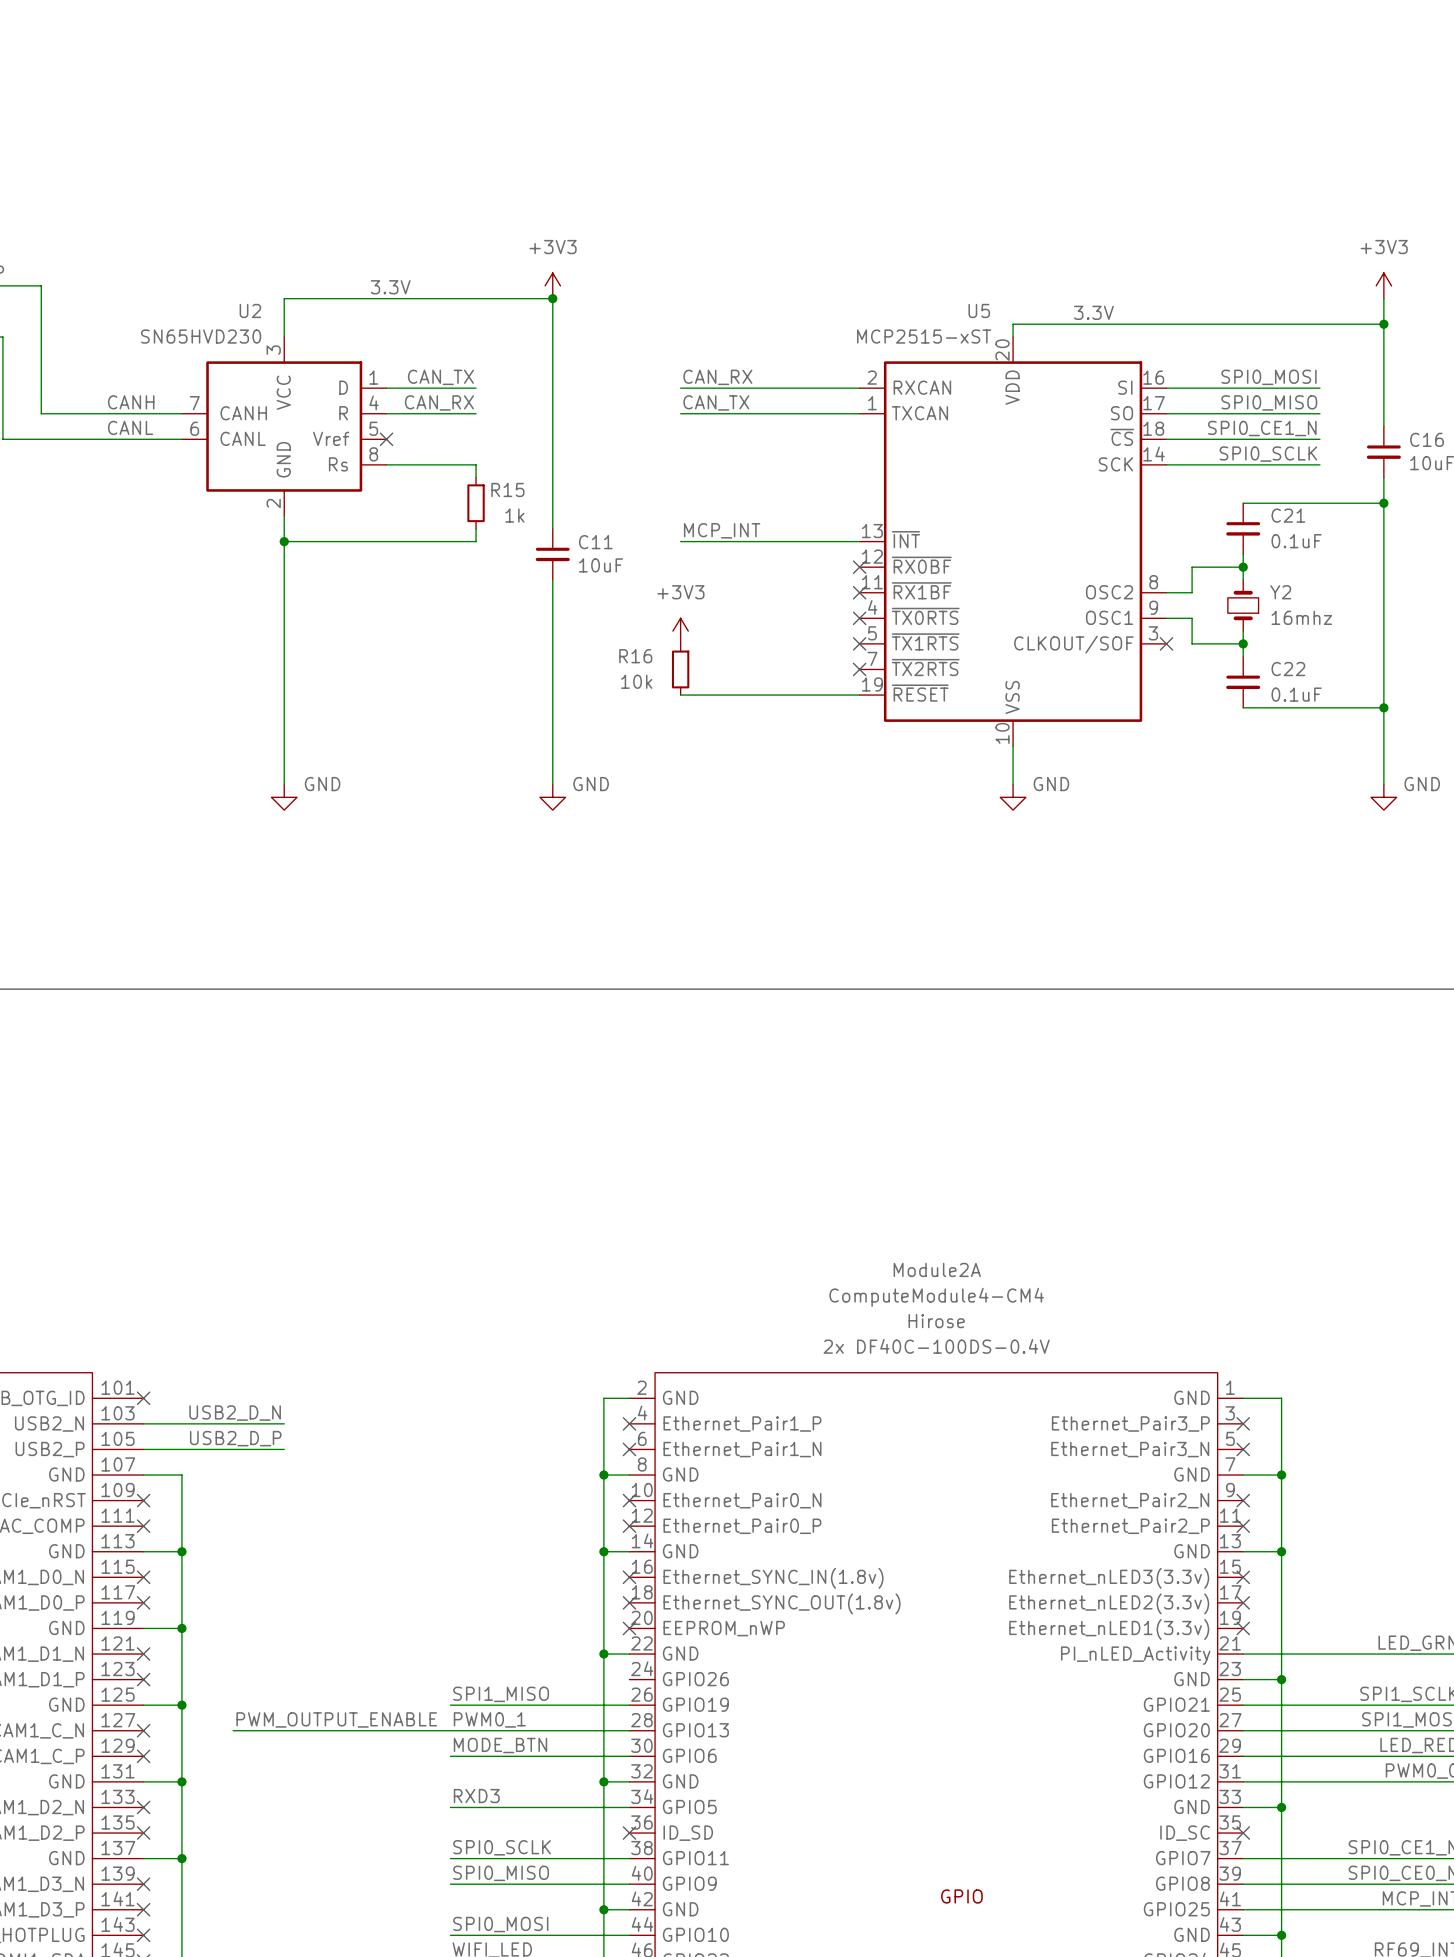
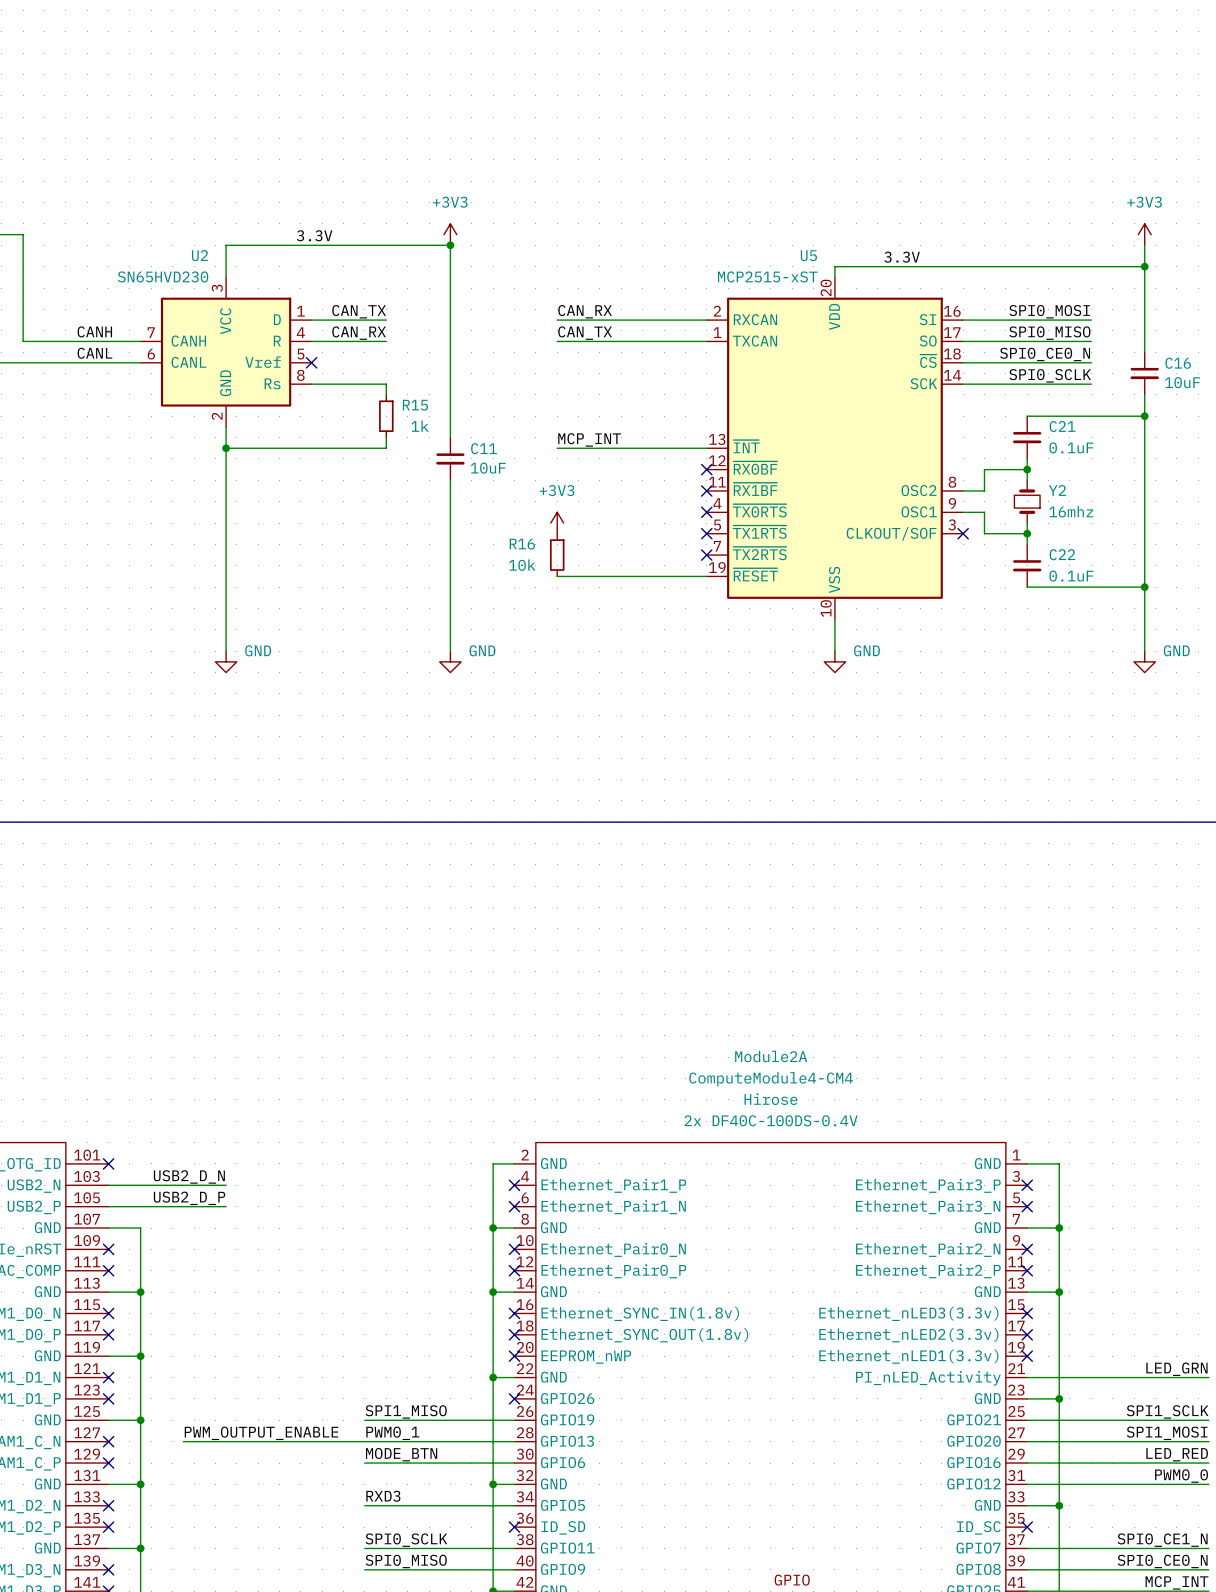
label: SPI0_CE1_N (1262, 428) -> SPI0_CE0_N (1045, 354)
no-connect mark: none -> (514, 1398)

